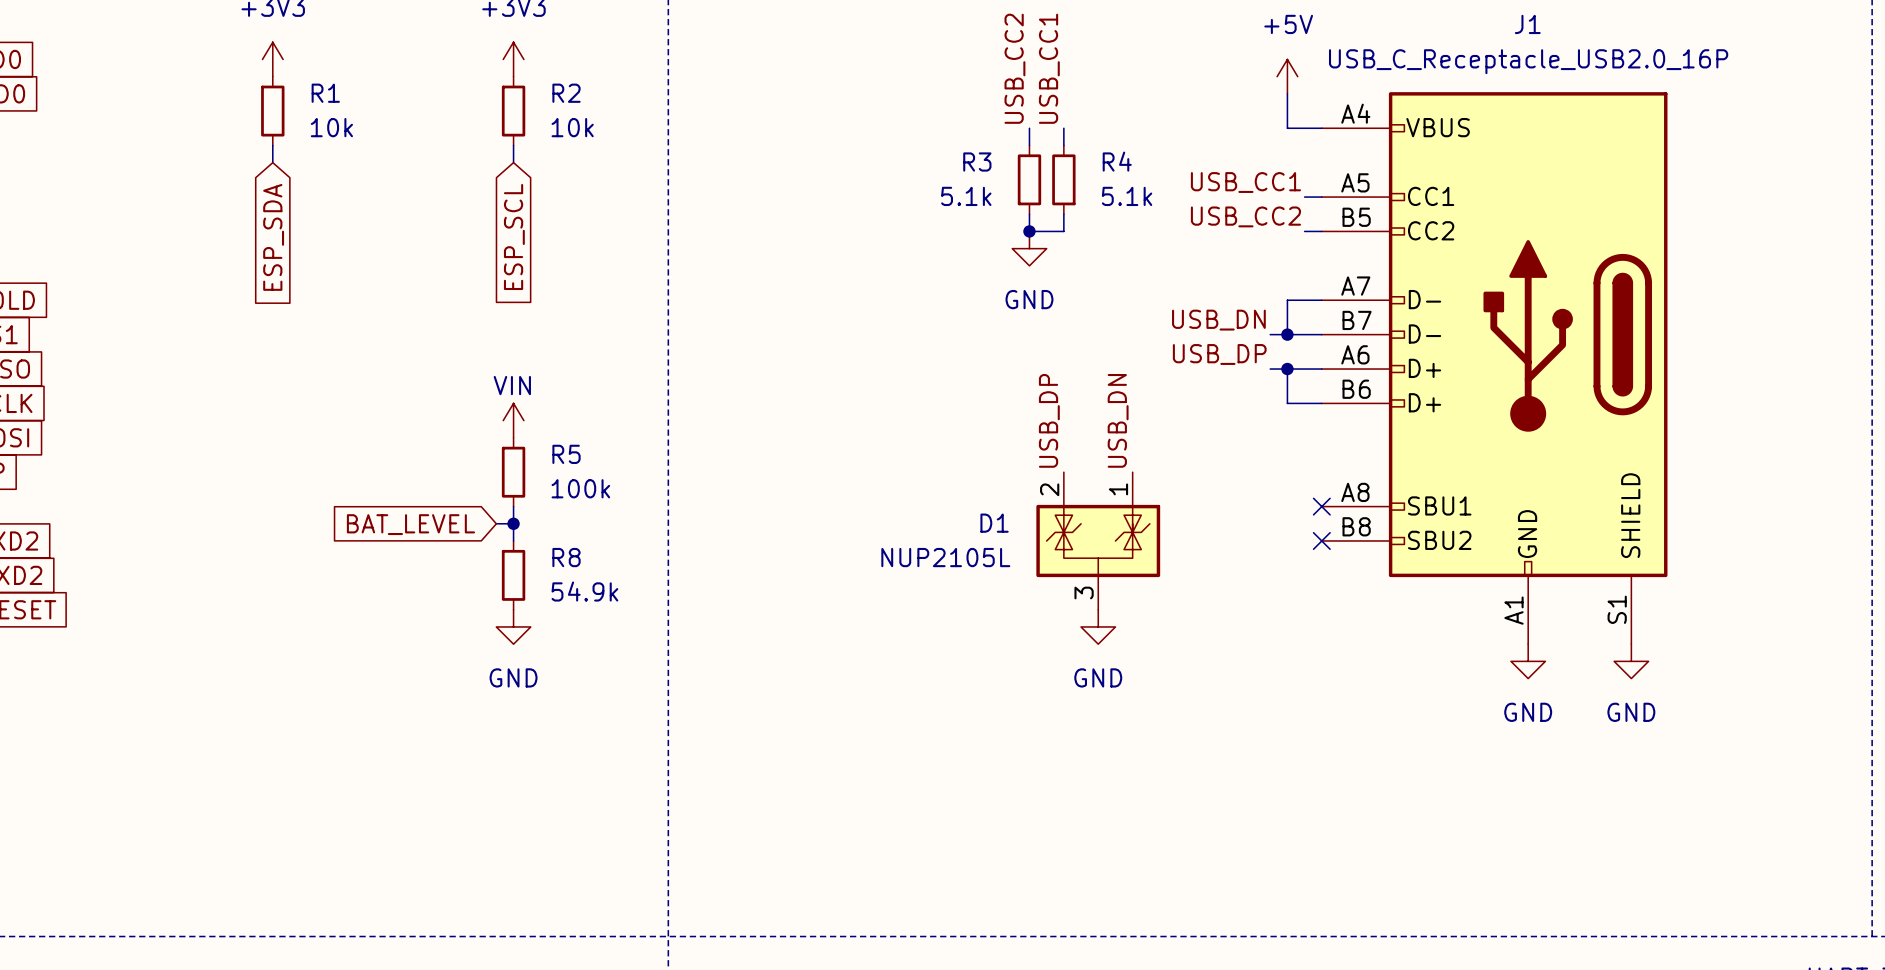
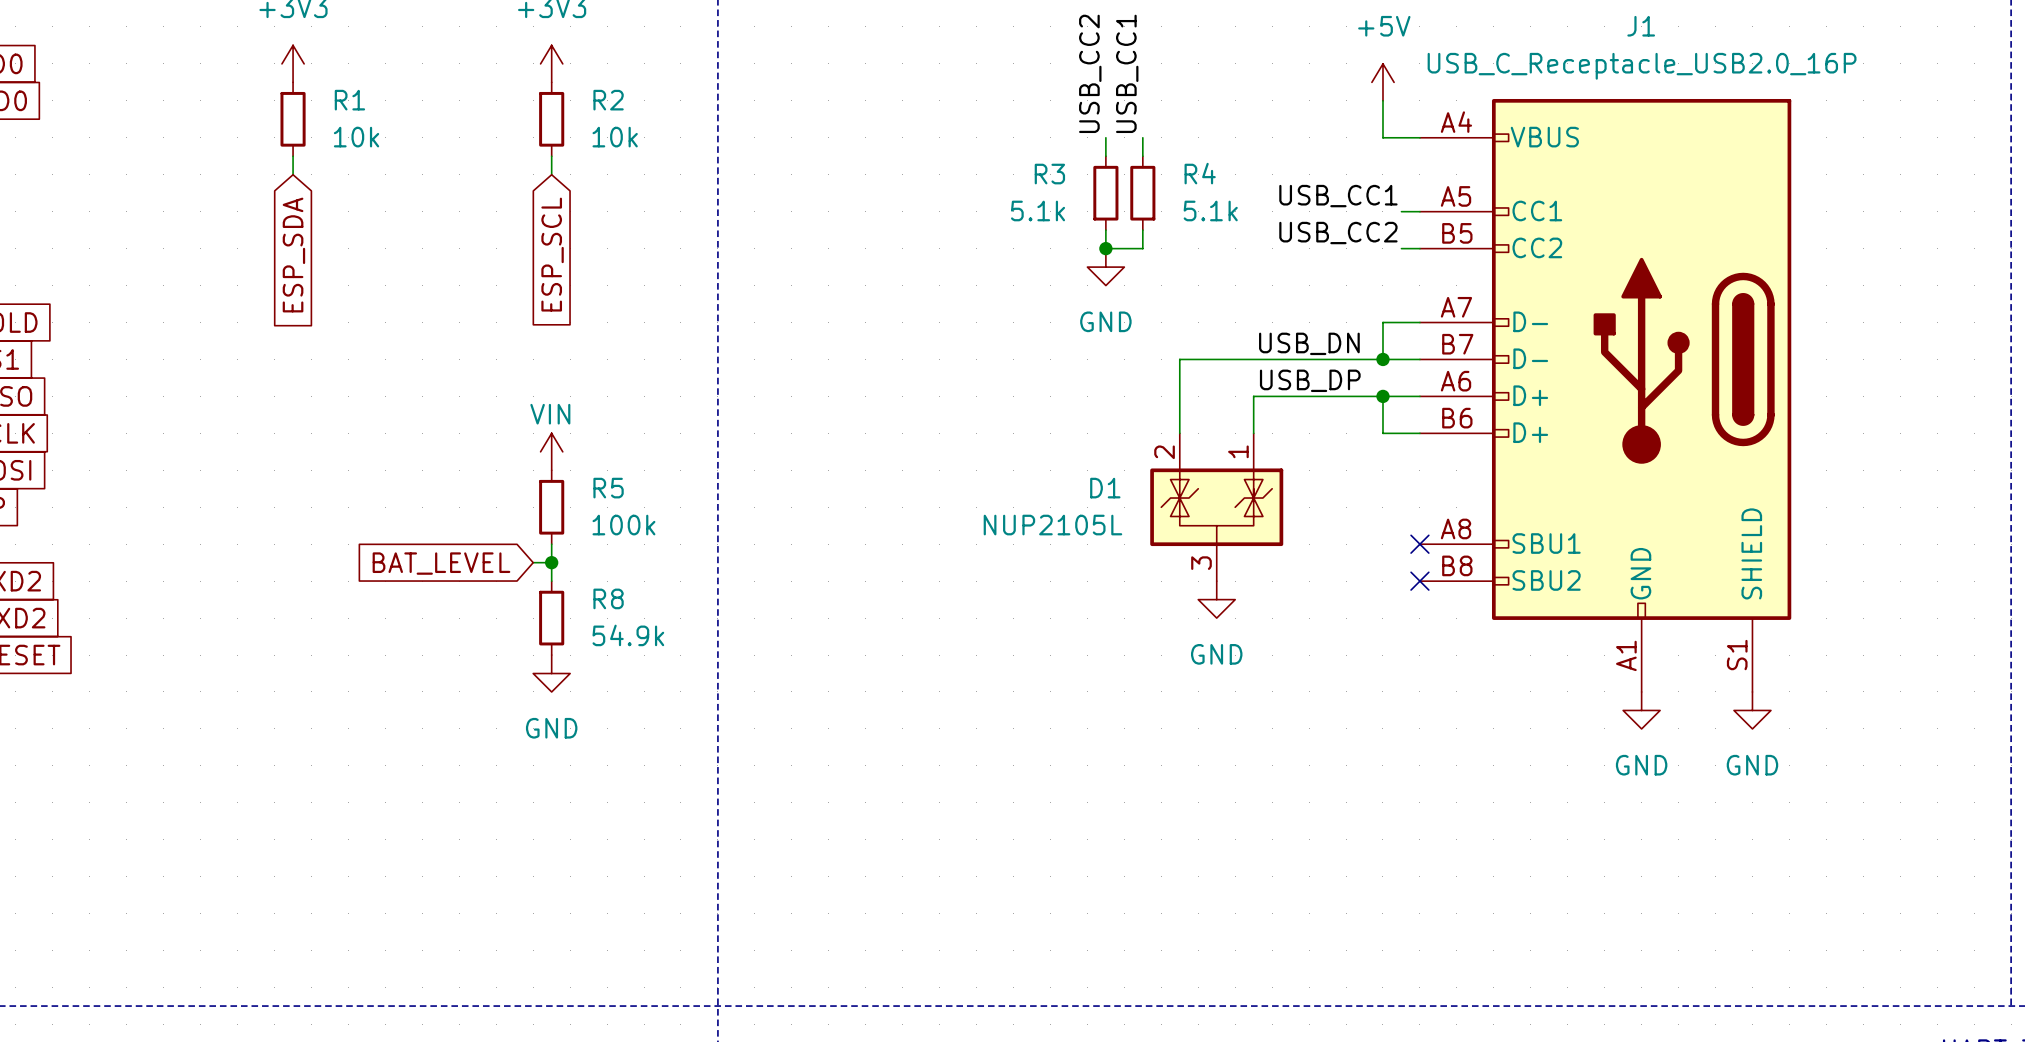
wire: none -> (1364, 359) (1179, 359) (1179, 433)
wire: none -> (1364, 396) (1253, 396) (1253, 433)
label: USB_DP (1049, 420) -> none
label: USB_DN (1118, 420) -> none
D1 position: (1098, 540) -> (1216, 507)
power symbol position: GND (1098, 626) -> GND (1216, 599)

